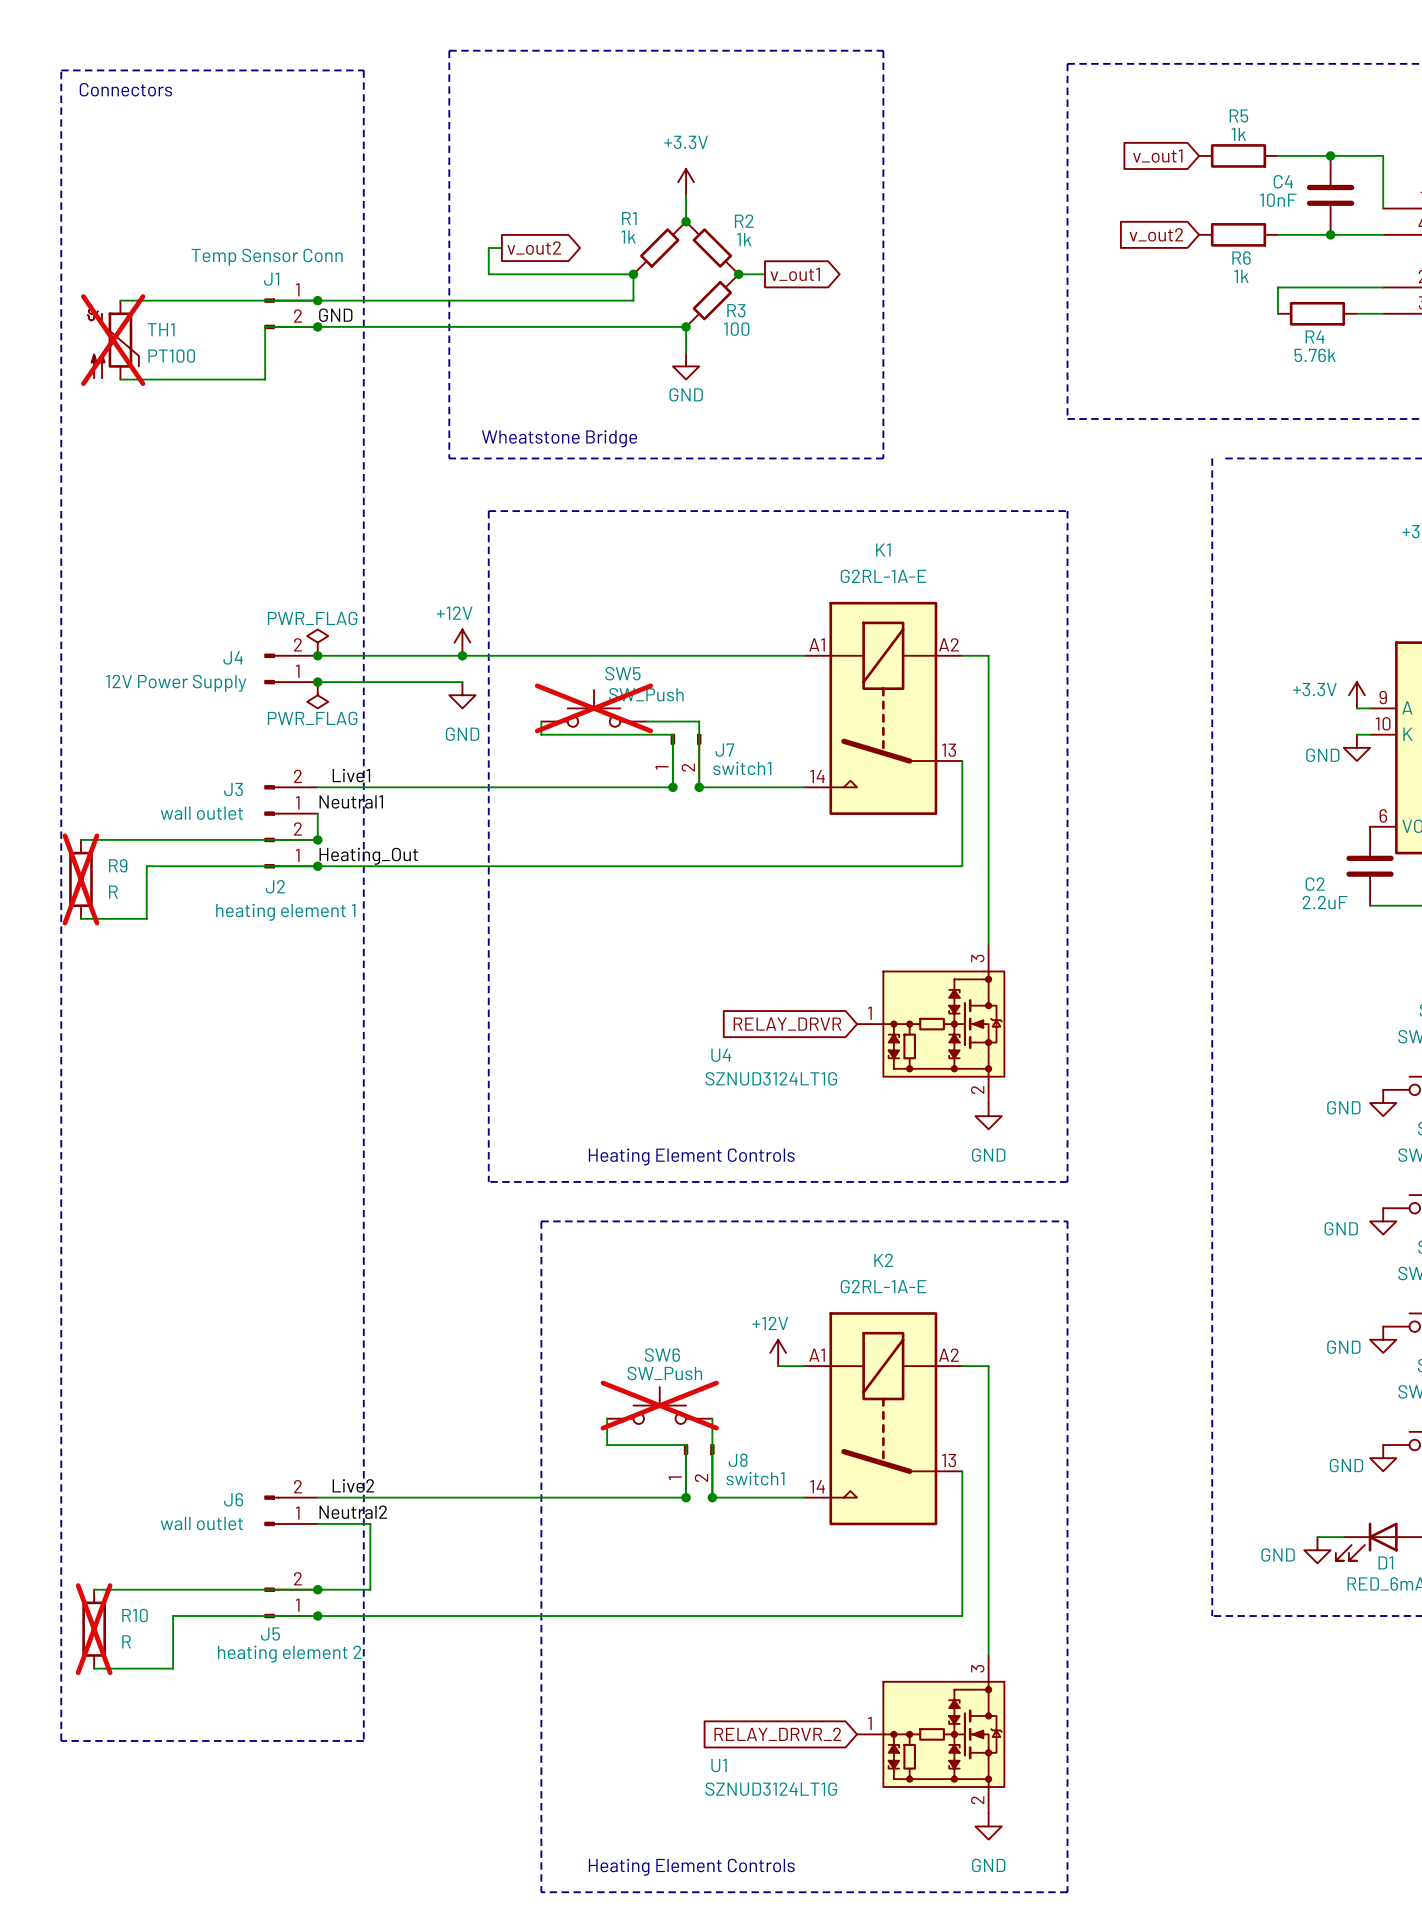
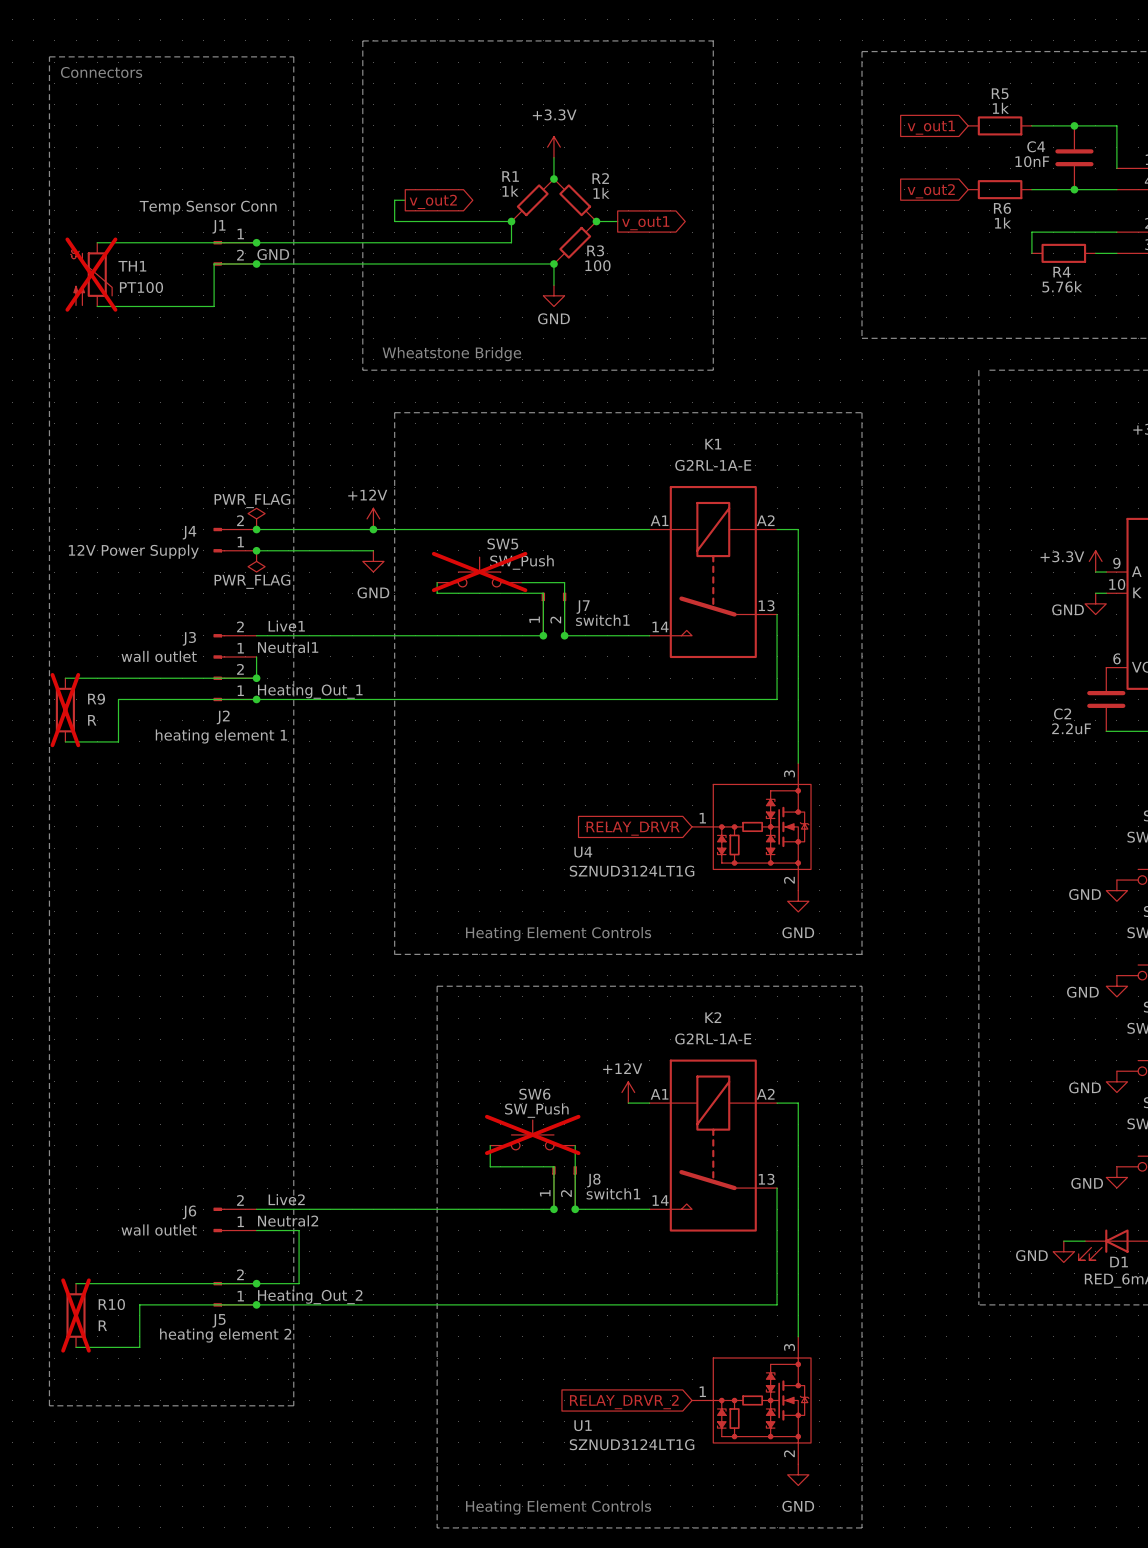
label: Heating_Out (368, 856) -> Heating_Out_1 (310, 691)
label: none -> Heating_Out_2 (310, 1296)

